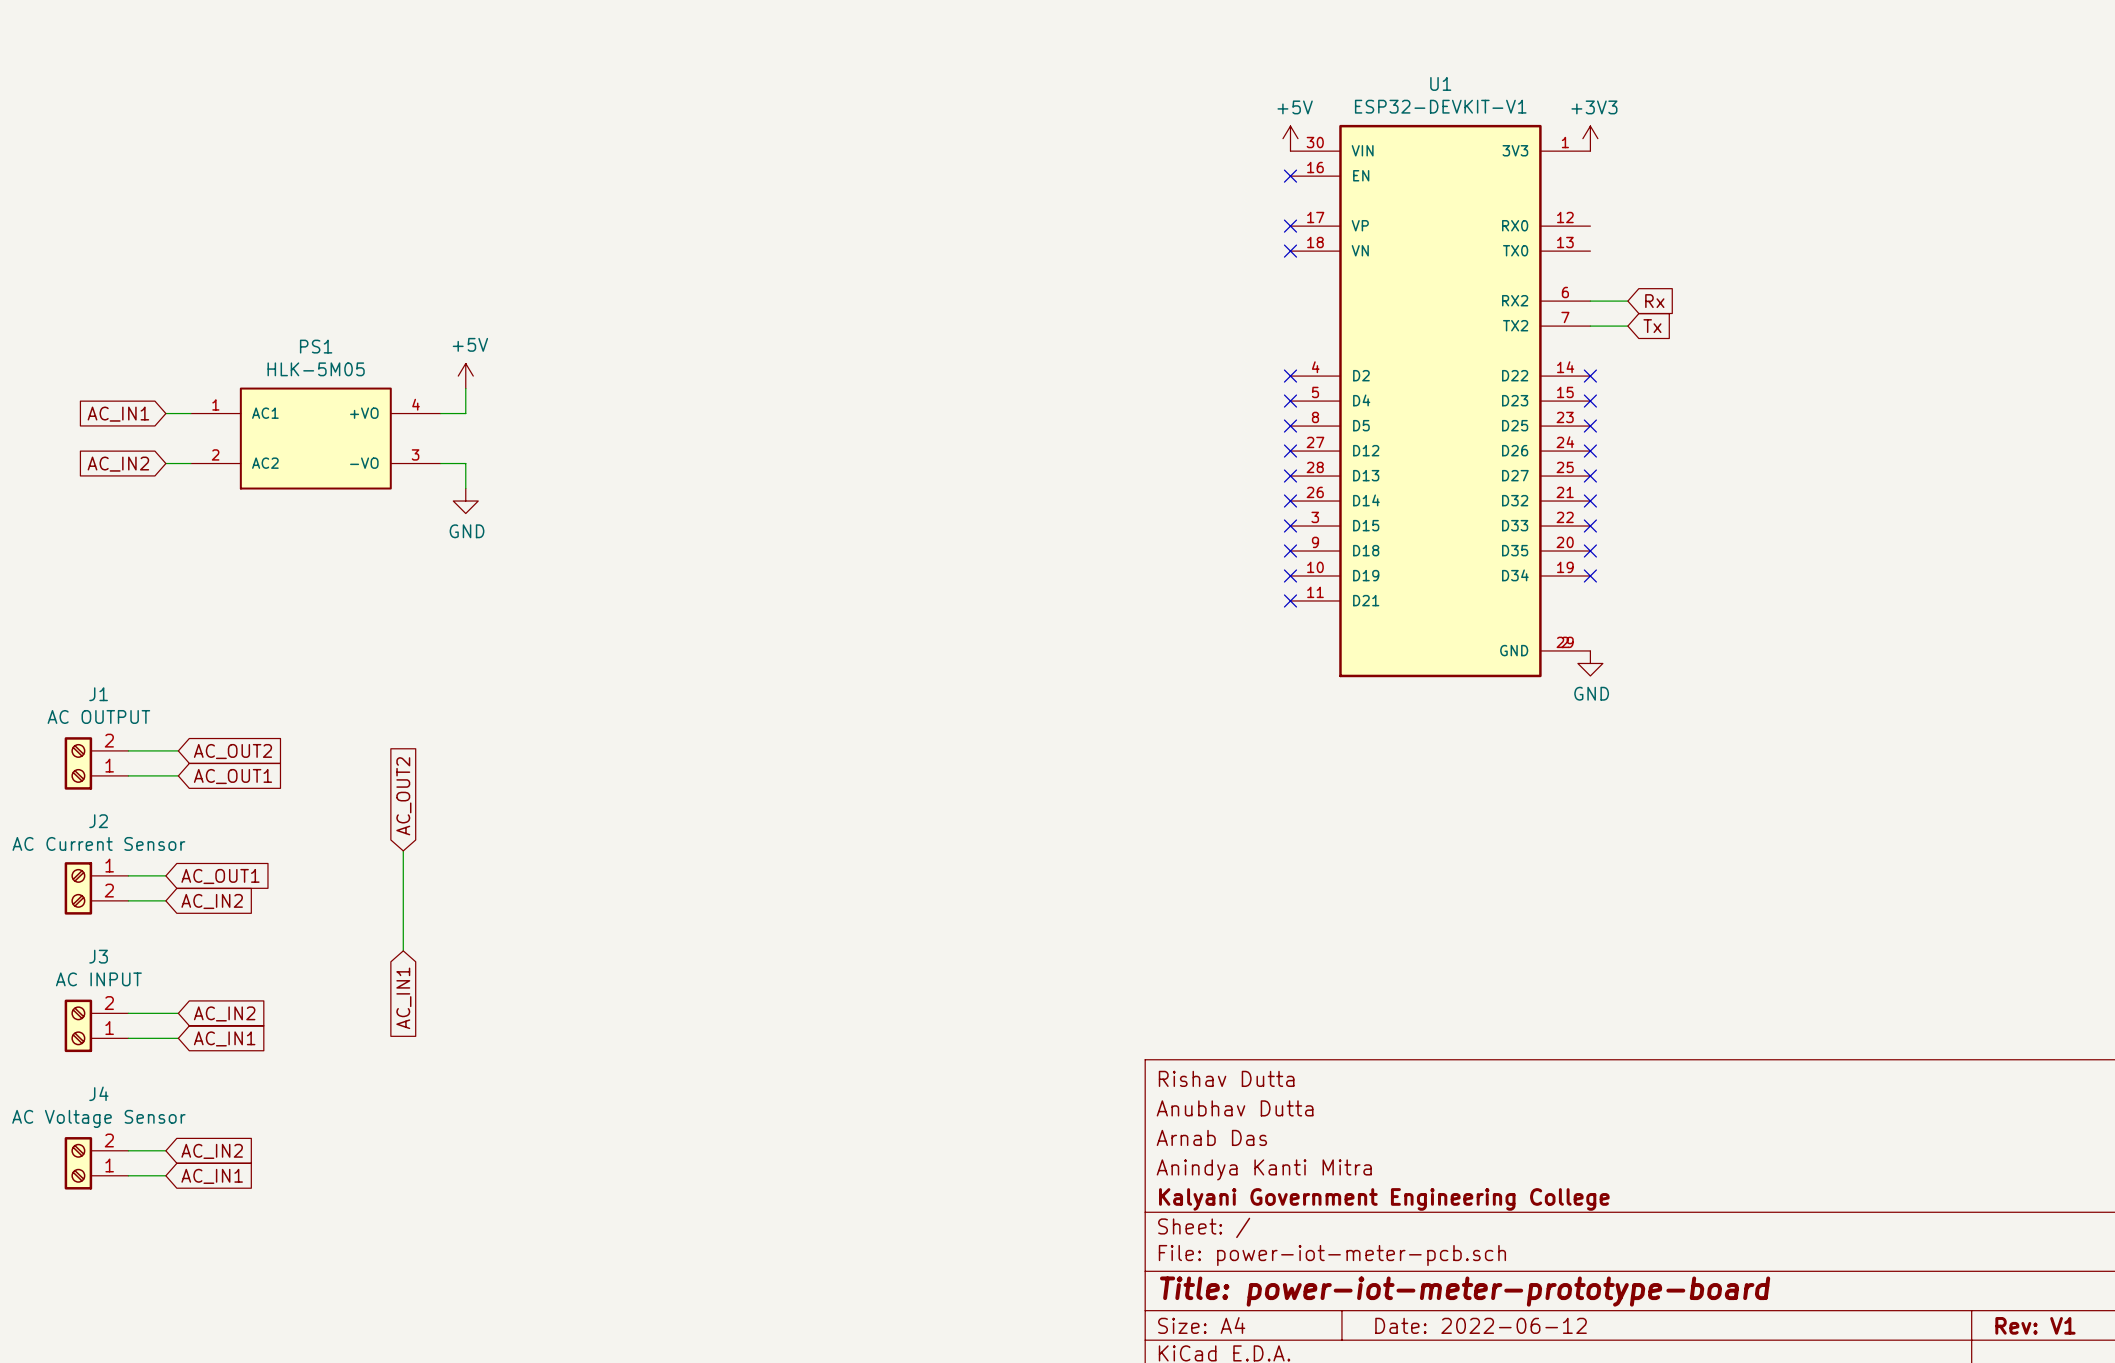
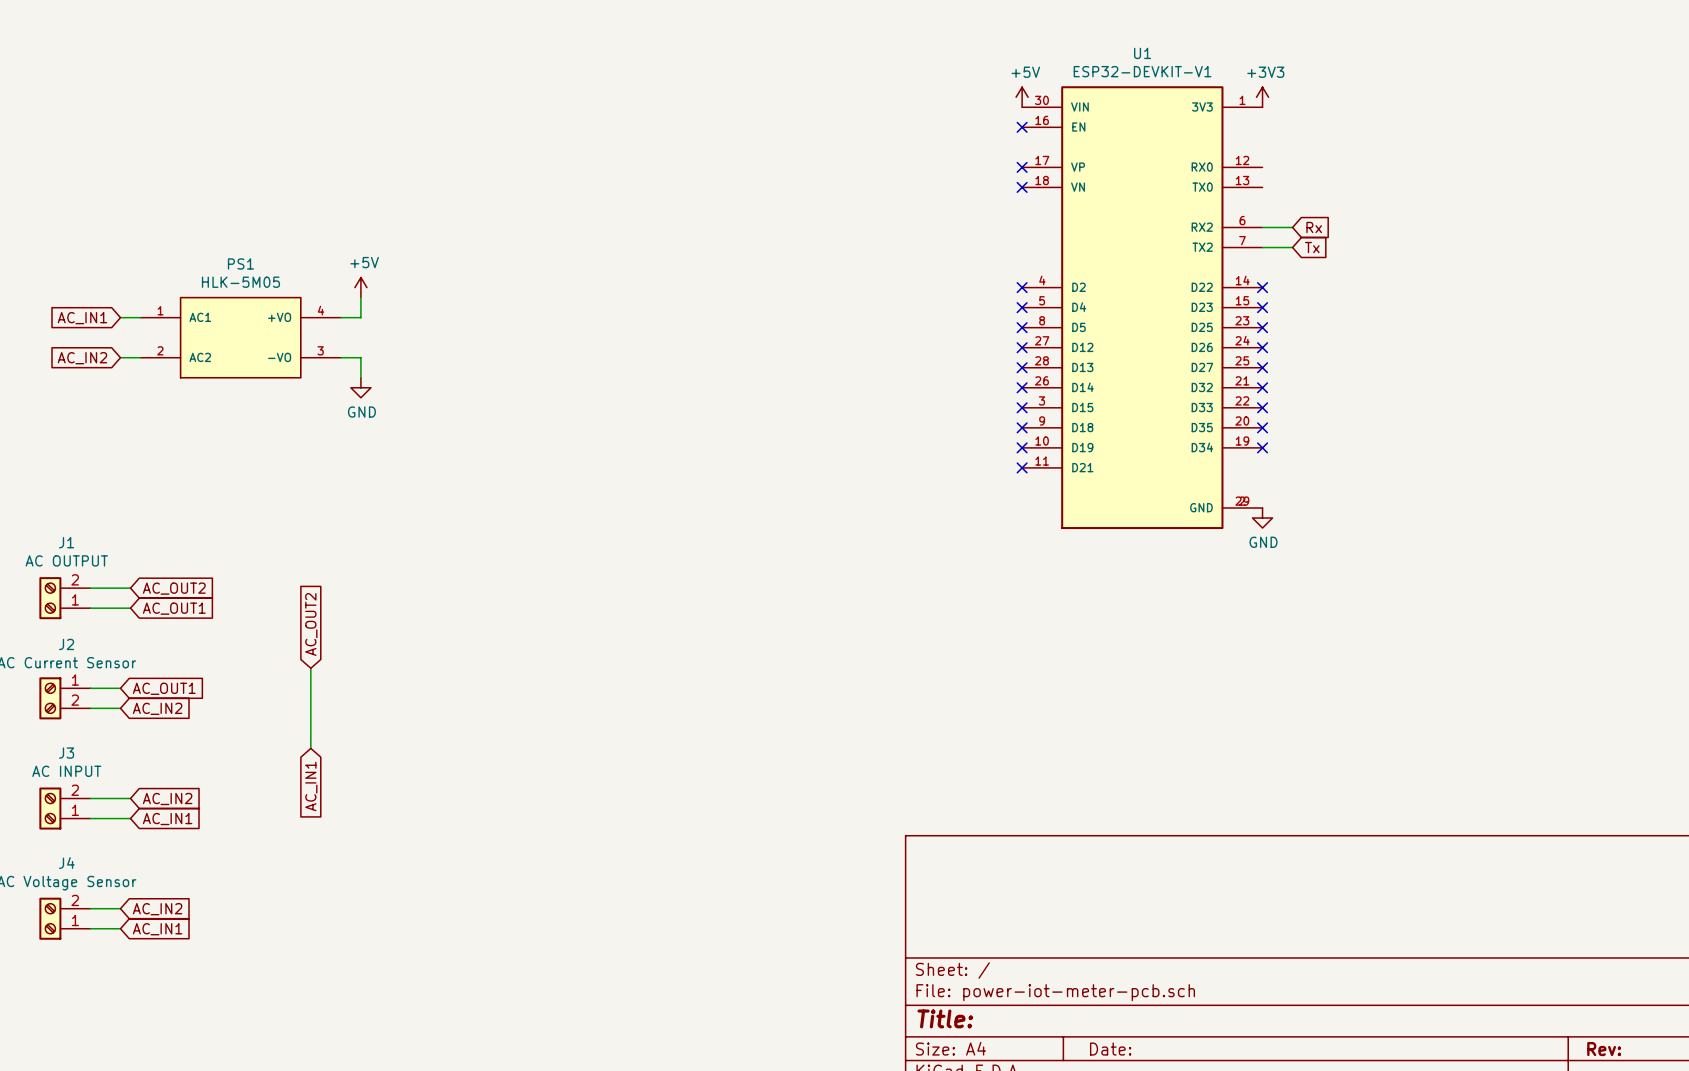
title block: Rishav Dutta (1226, 1078) -> none
title block: Anubhav Dutta (1235, 1108) -> none
title block: Arnab Das (1211, 1137) -> none
title block: Anindya Kanti Mitra (1264, 1169) -> none
title block: Kalyani Government Engineering College (1384, 1199) -> none
title block: Title: power-iot-meter-prototype-board (1465, 1291) -> Title: (945, 1018)
title block: Date: 2022-06-12 (1481, 1325) -> Date: (1110, 1049)
title block: Rev: V1 (2035, 1325) -> Rev: (1604, 1049)

